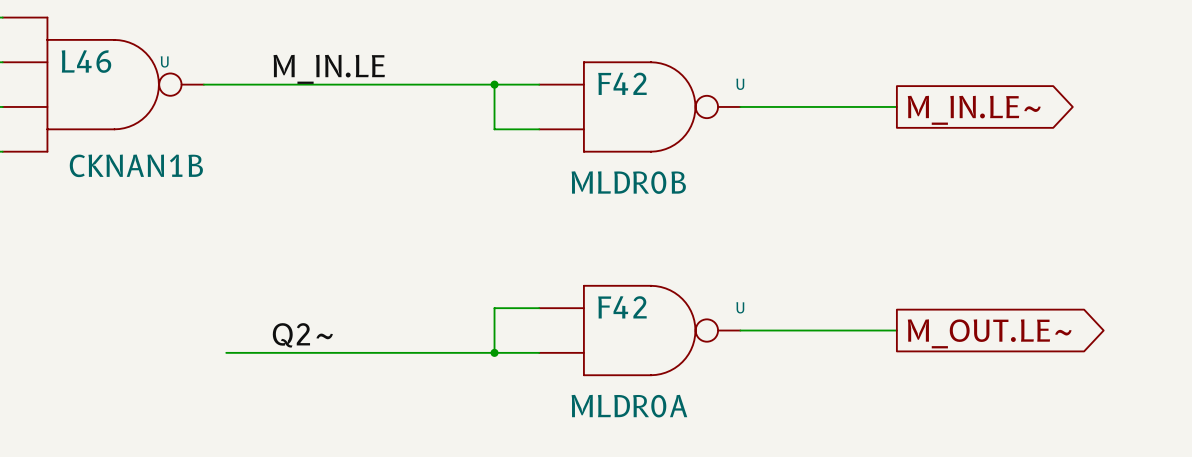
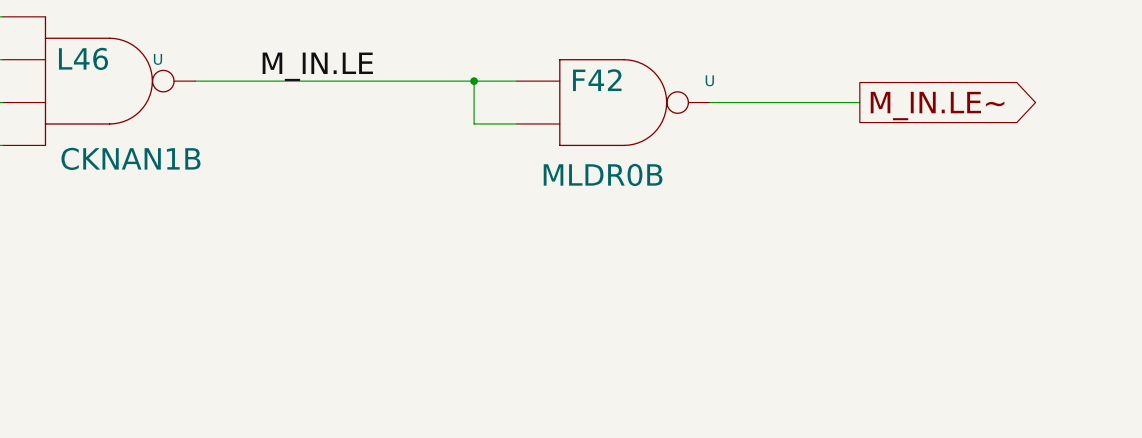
wire: (539, 308) (494, 308) (494, 352) -> none
U: (639, 330) -> none
wire: (740, 330) (896, 330) -> none
global label: M_OUT.LE~ (989, 333) -> none
label: Q2~ (302, 335) -> none
wire: (226, 352) (539, 352) -> none
junction: (494, 352) -> none

